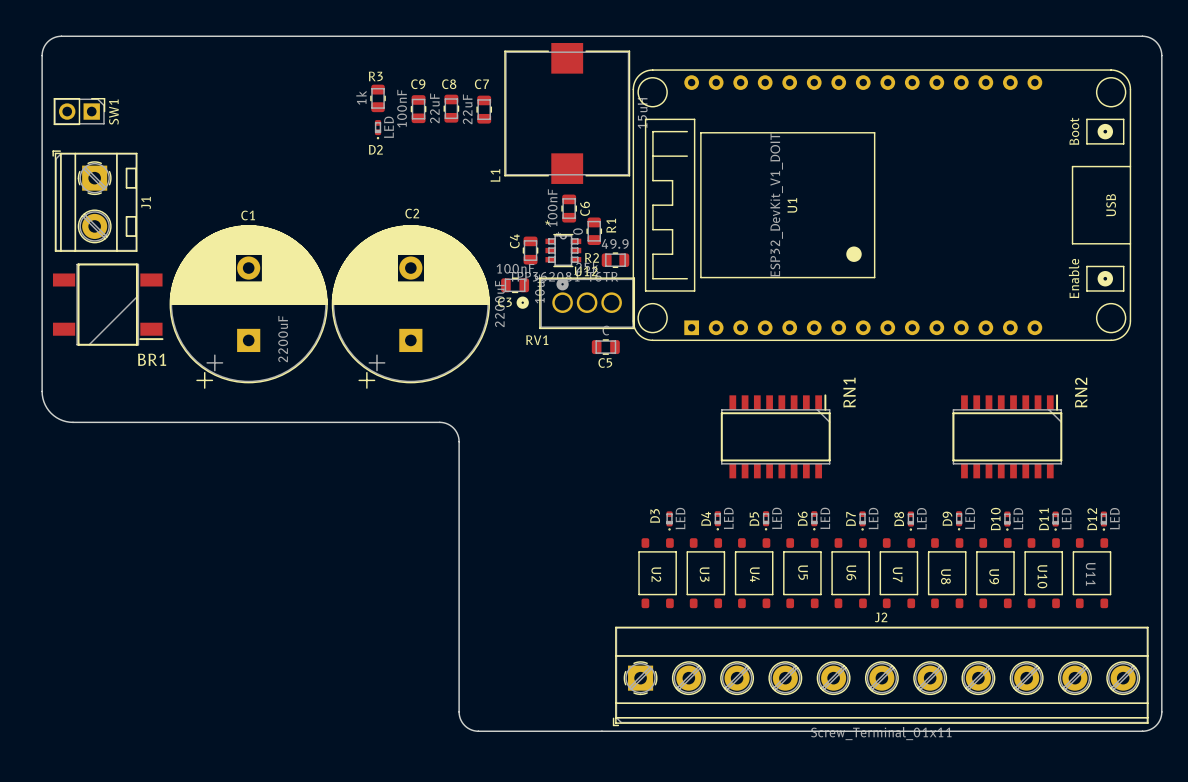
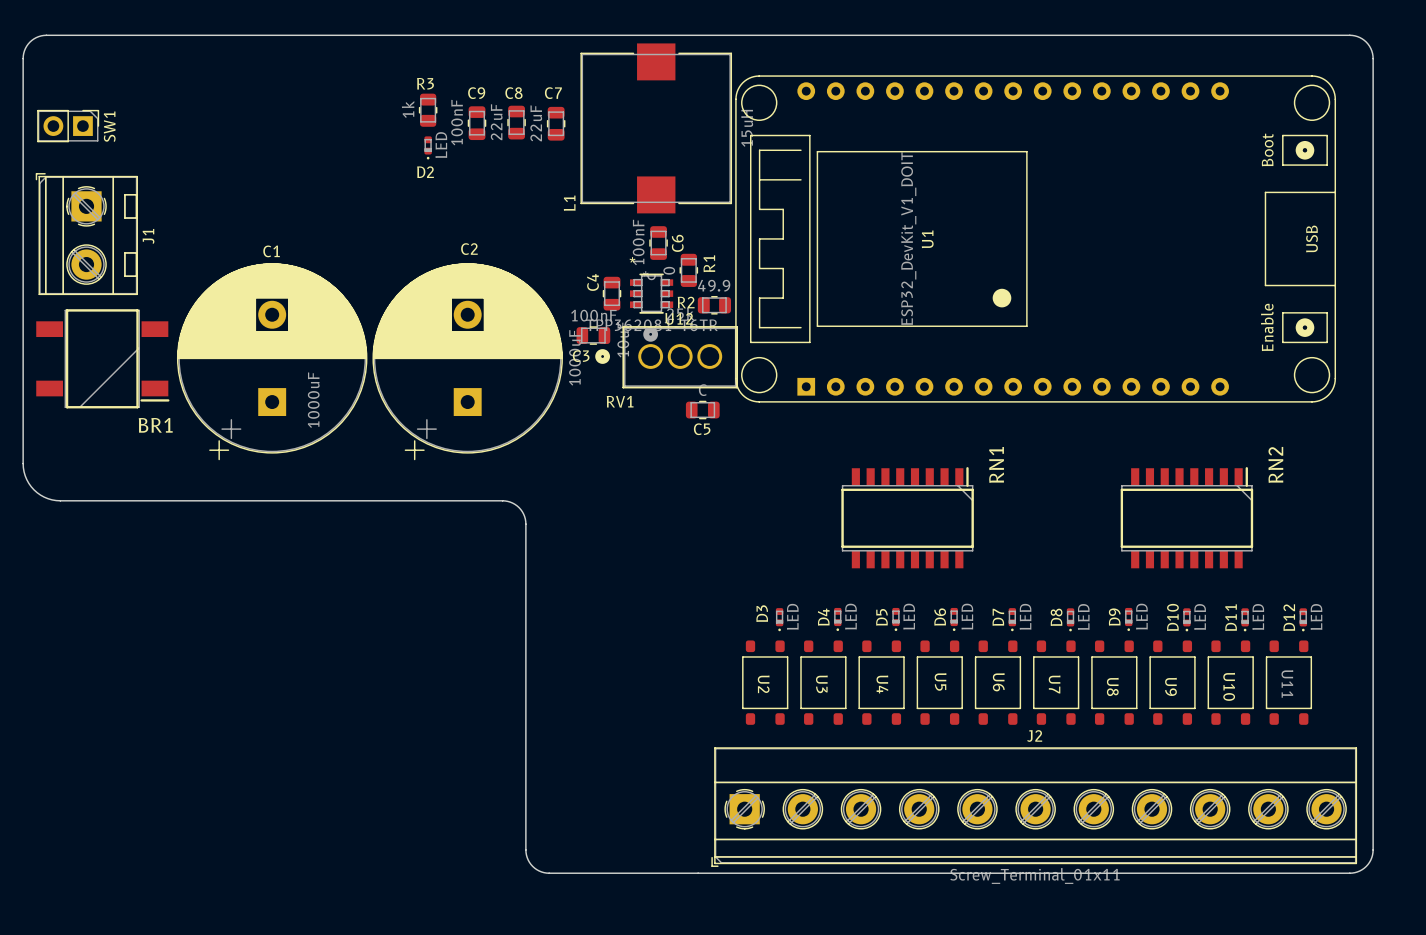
C2 value: 2200uF (499, 303) -> 1000uF (574, 357)
C1 value: 2200uF (283, 339) -> 1000uF (313, 400)

